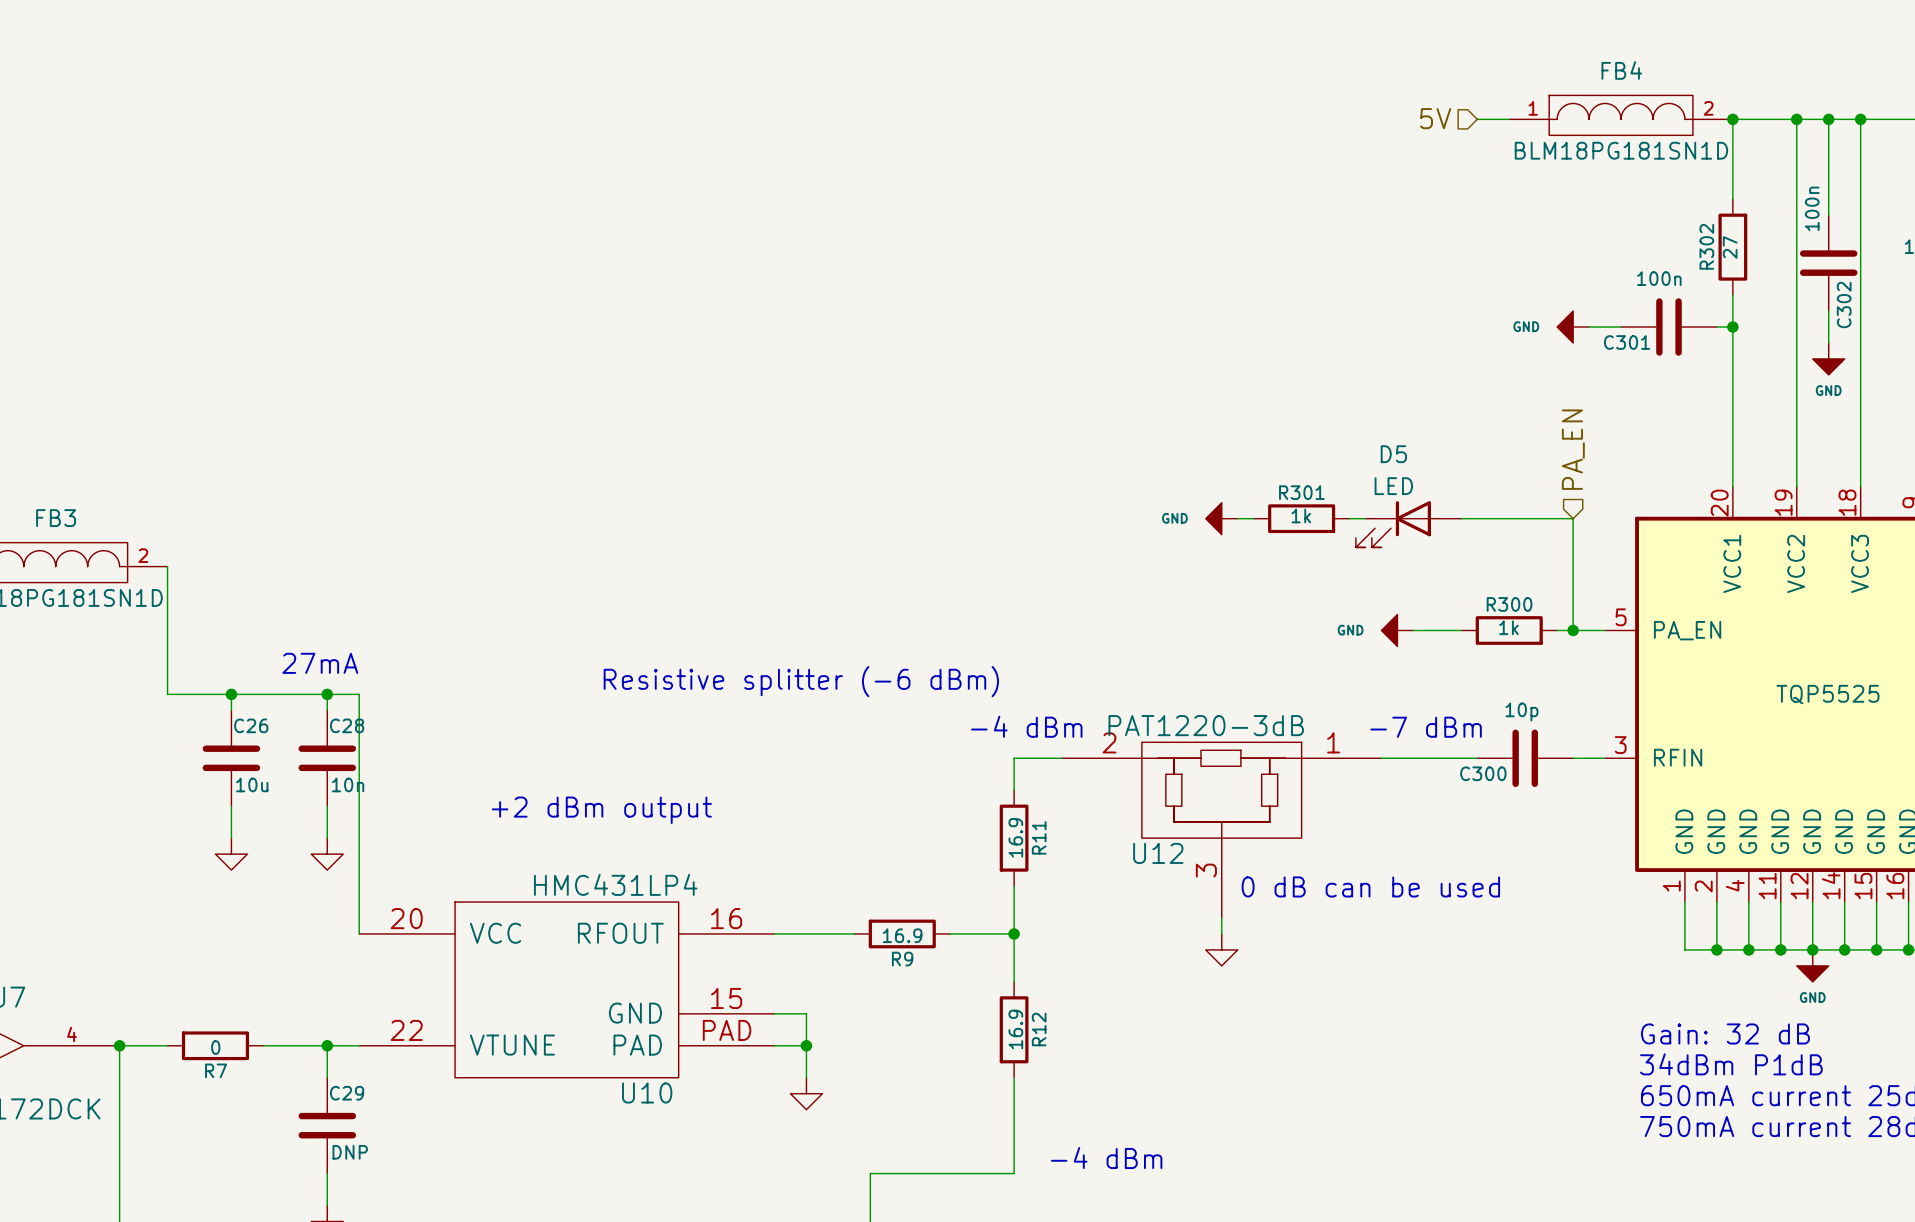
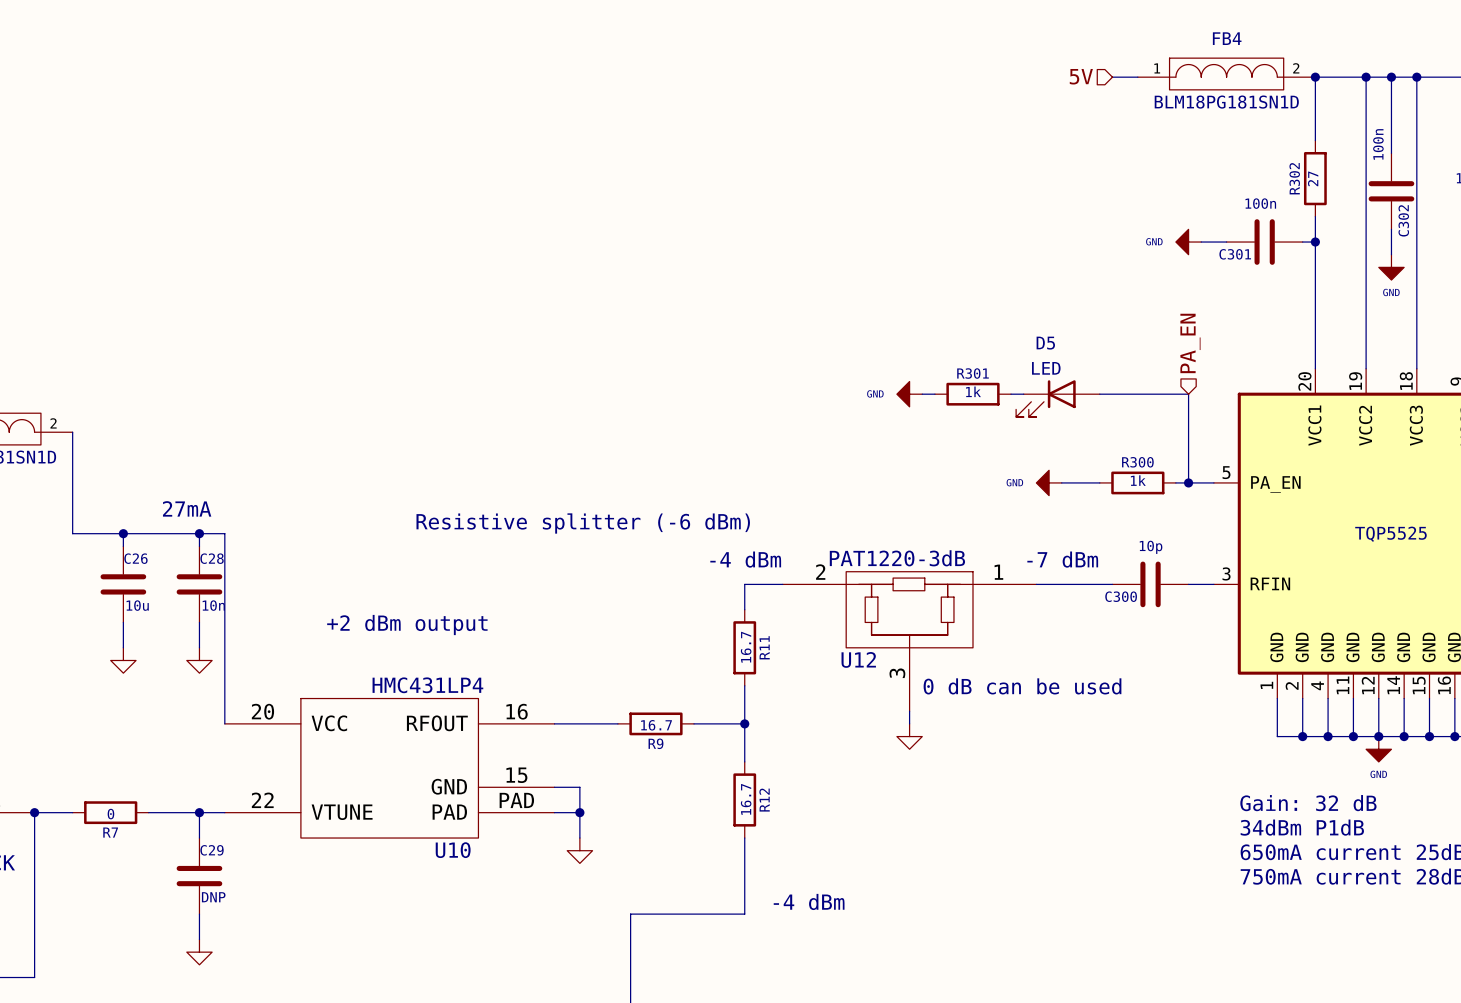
R11 value: 16.9 (1015, 837) -> 16.7 (746, 647)
R9 value: 16.9 (902, 935) -> 16.7 (656, 725)
R12 value: 16.9 (1015, 1029) -> 16.7 (746, 799)

